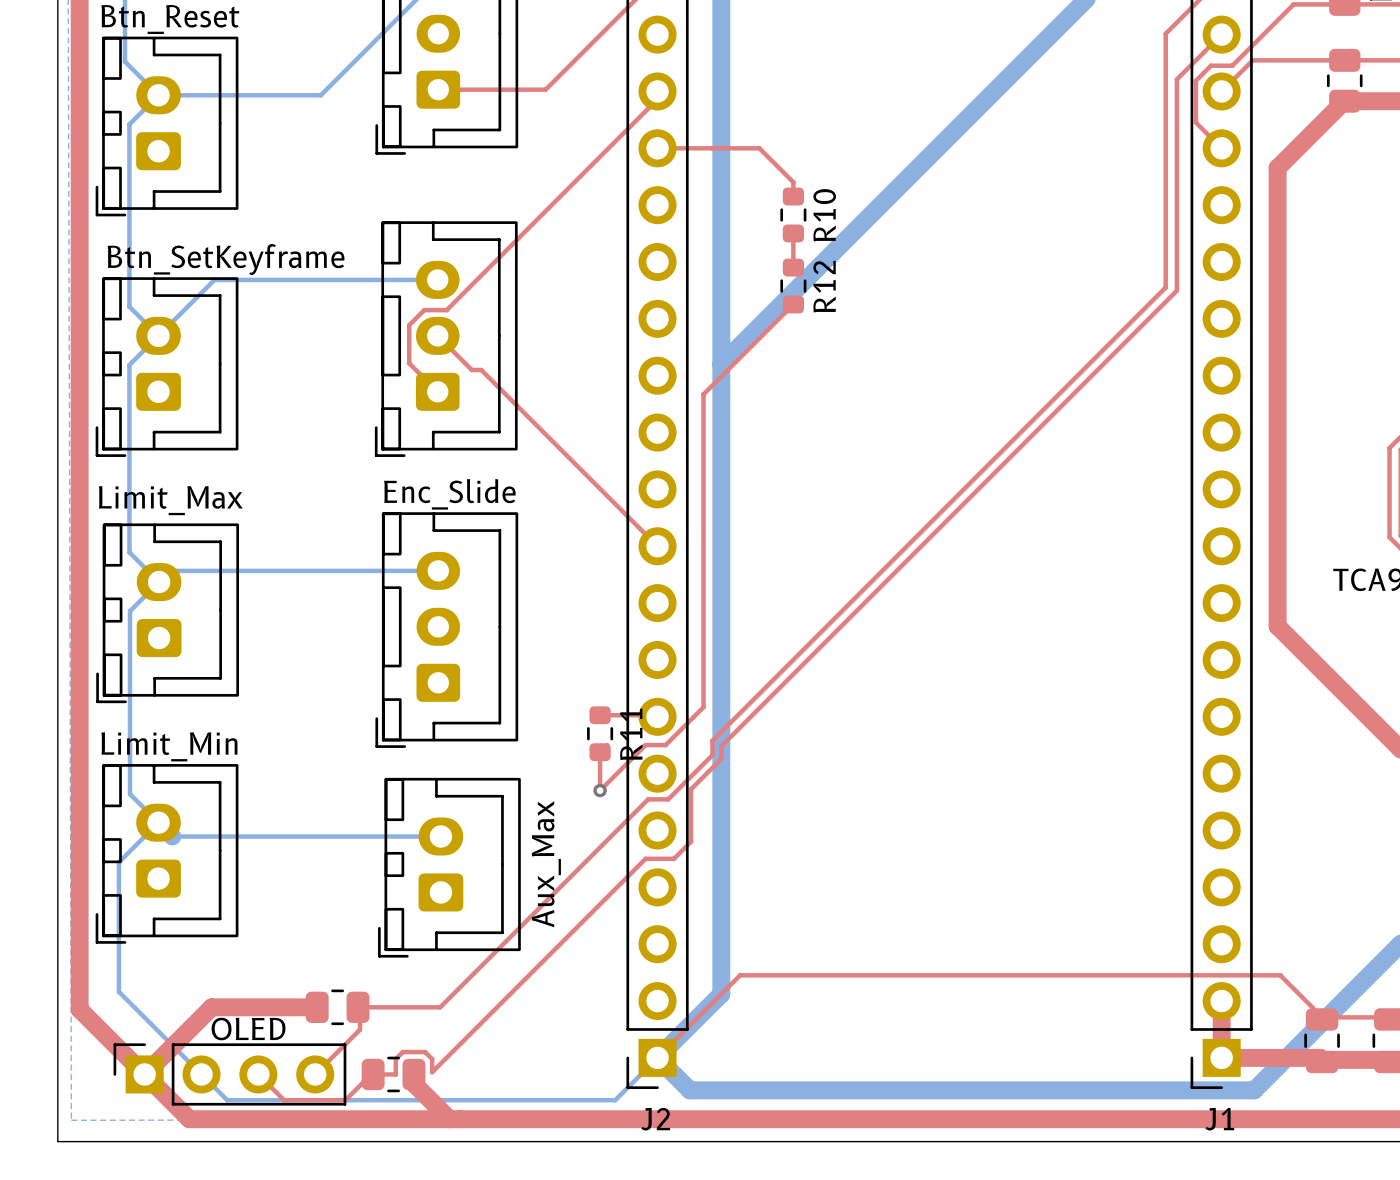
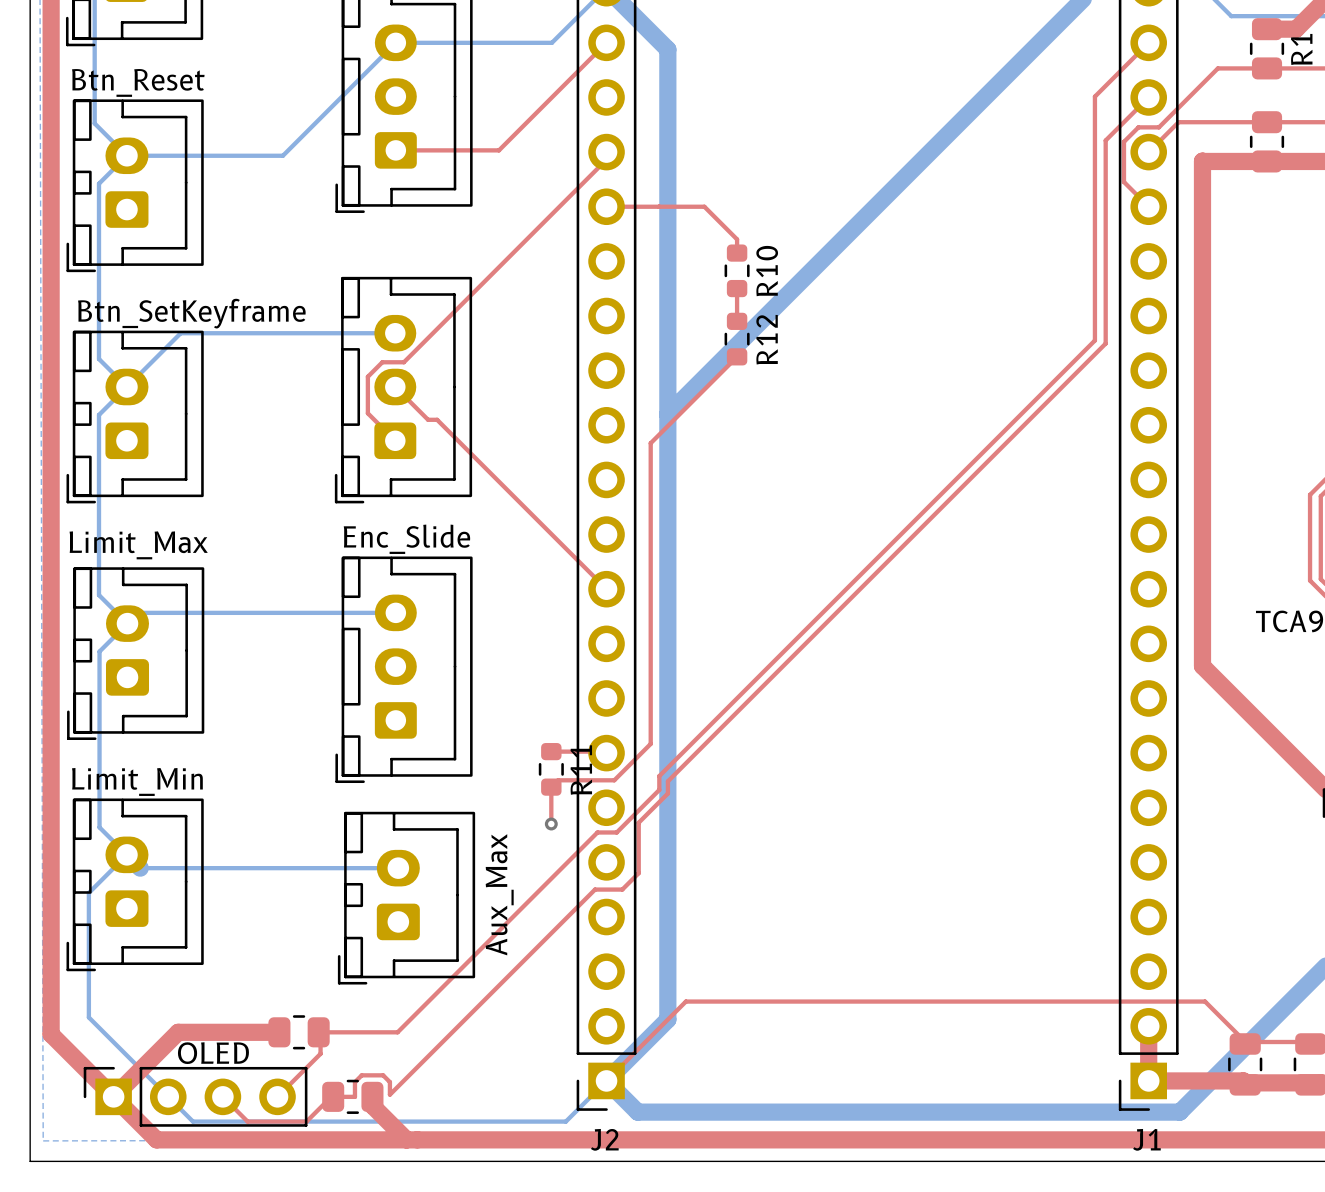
top track: (1344, 101) (1277, 168) -> (1266, 161) (1202, 161) (1202, 225)
top track: (645, 745) (600, 790) -> (595, 780) (558, 780)

